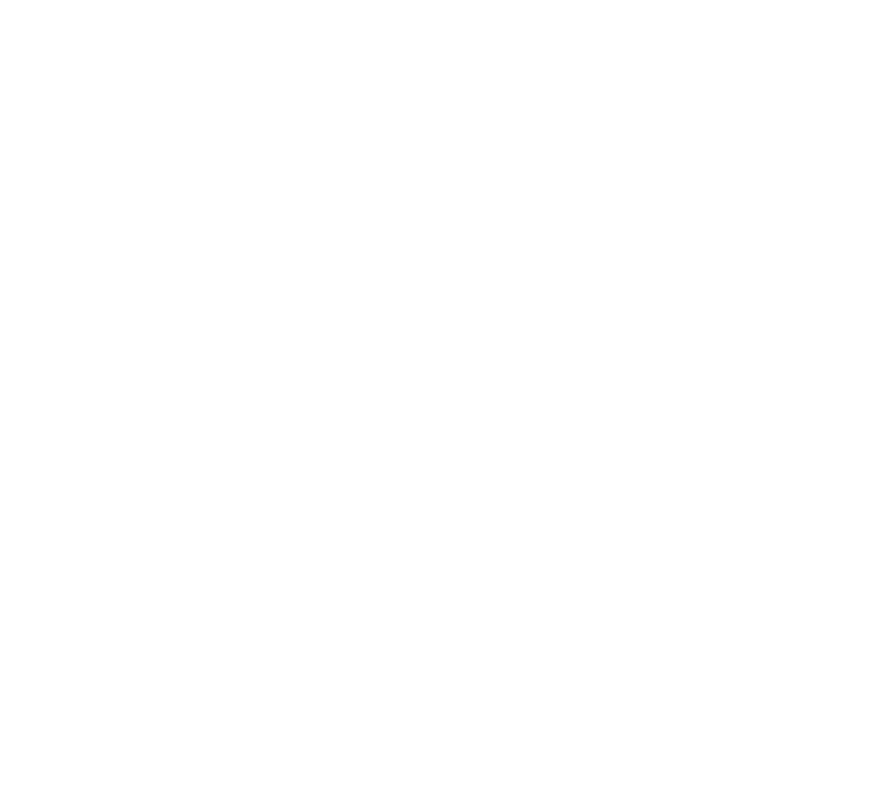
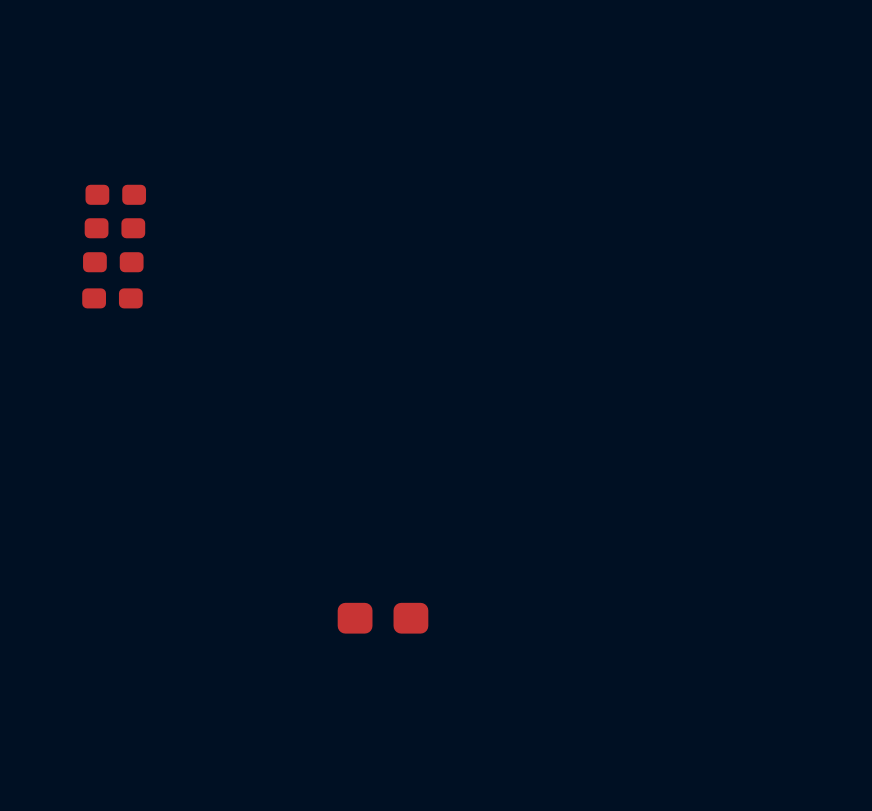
part: none -> (115, 194)
part: none -> (114, 228)
part: none -> (113, 262)
part: none -> (112, 298)
part: none -> (383, 618)

